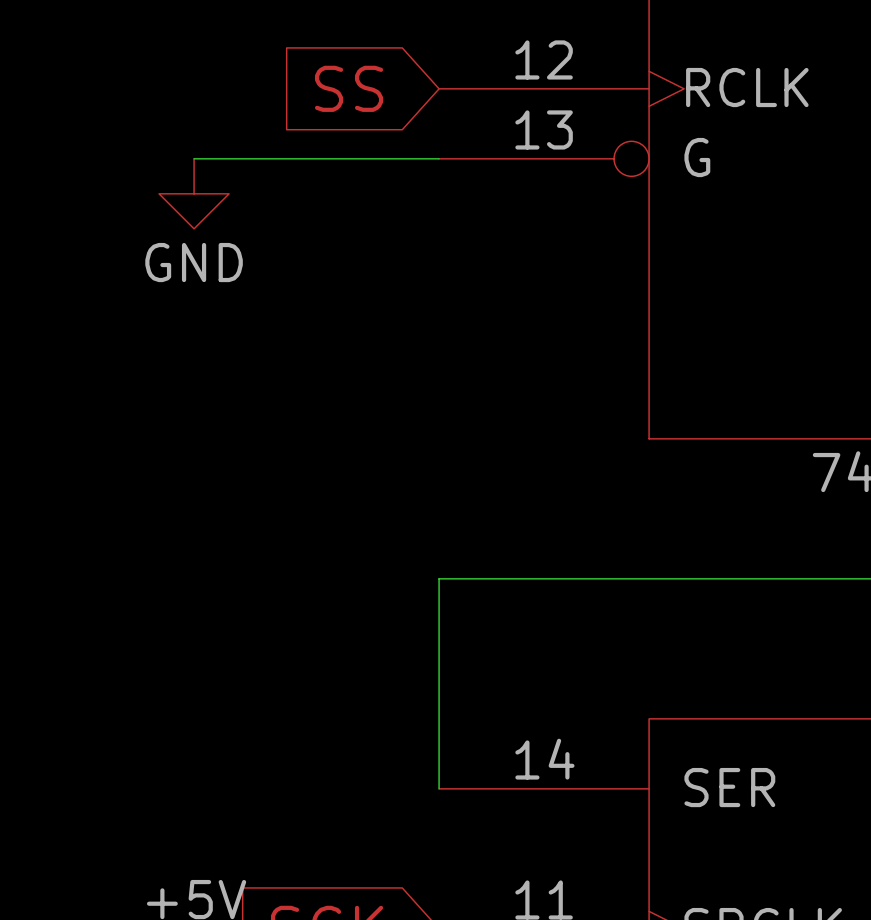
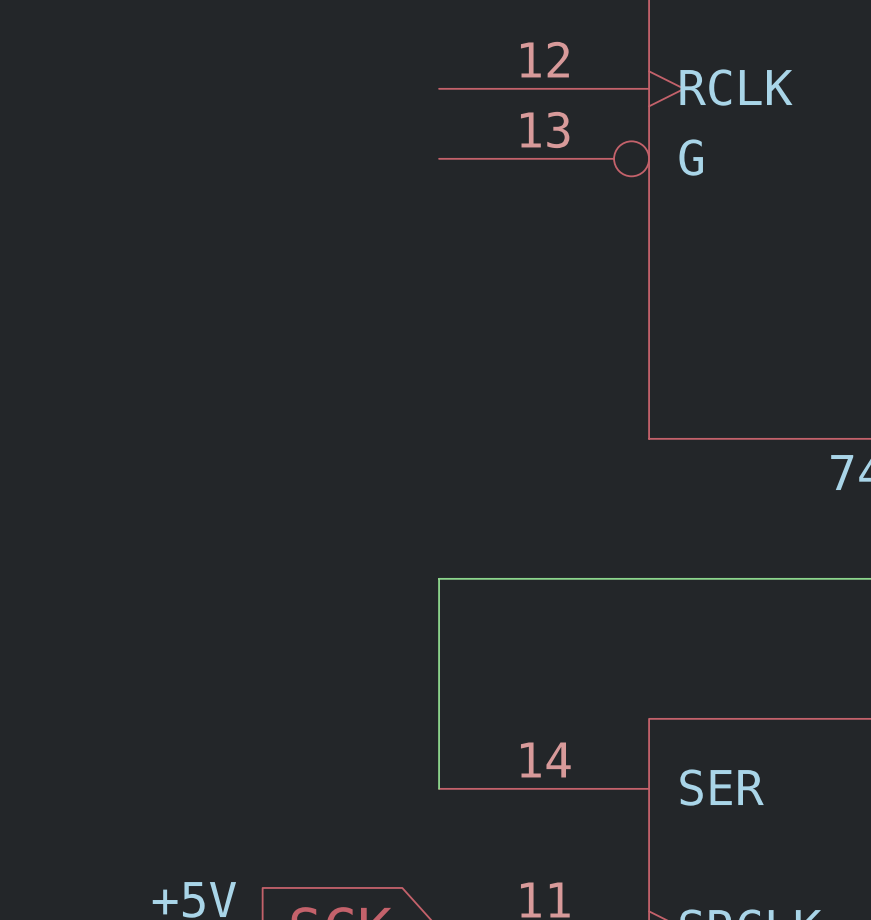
global label: SS (349, 88) -> none
wire: (194, 158) (439, 158) -> none
power symbol: GND (194, 193) -> none

